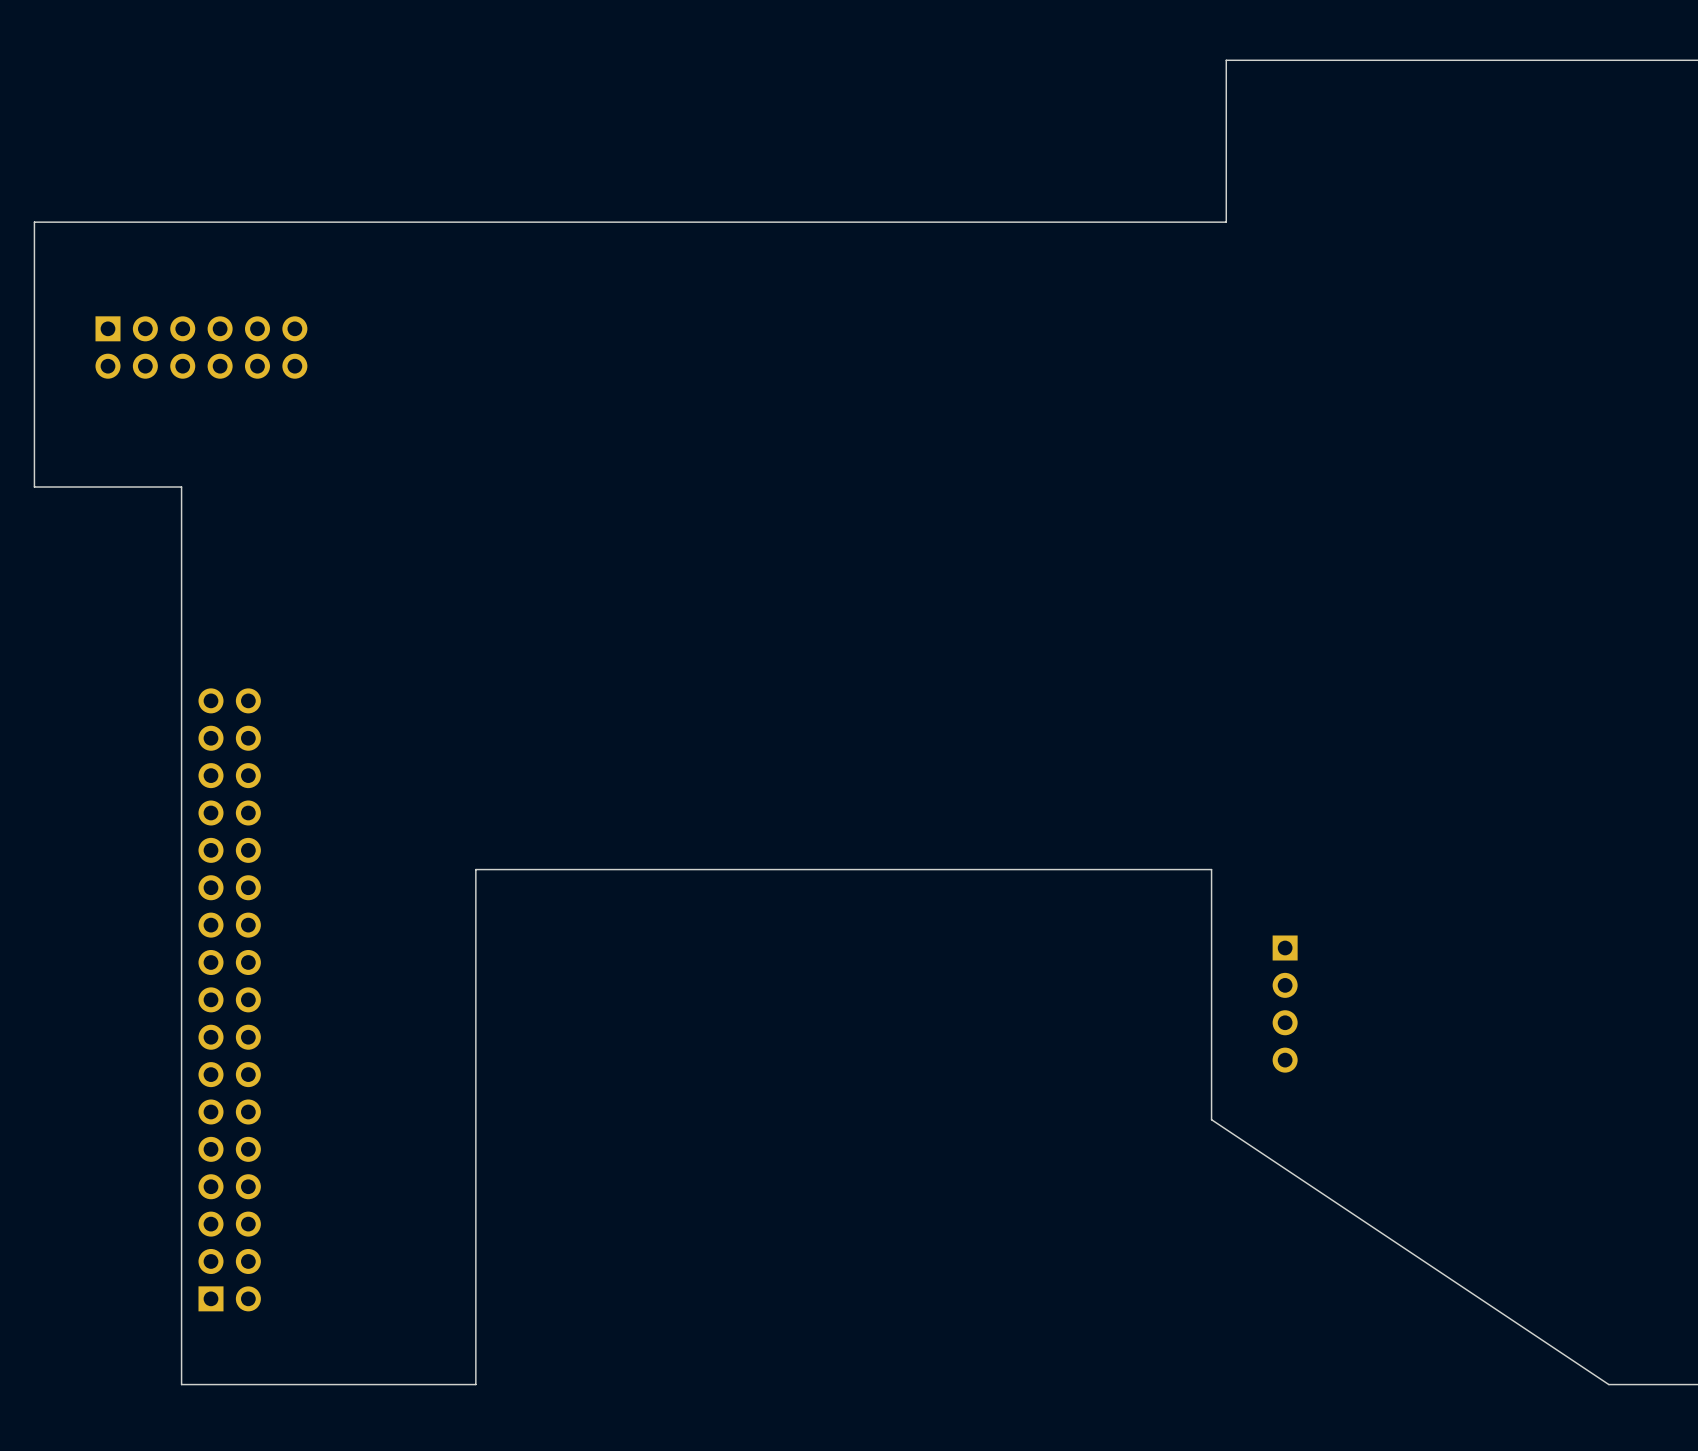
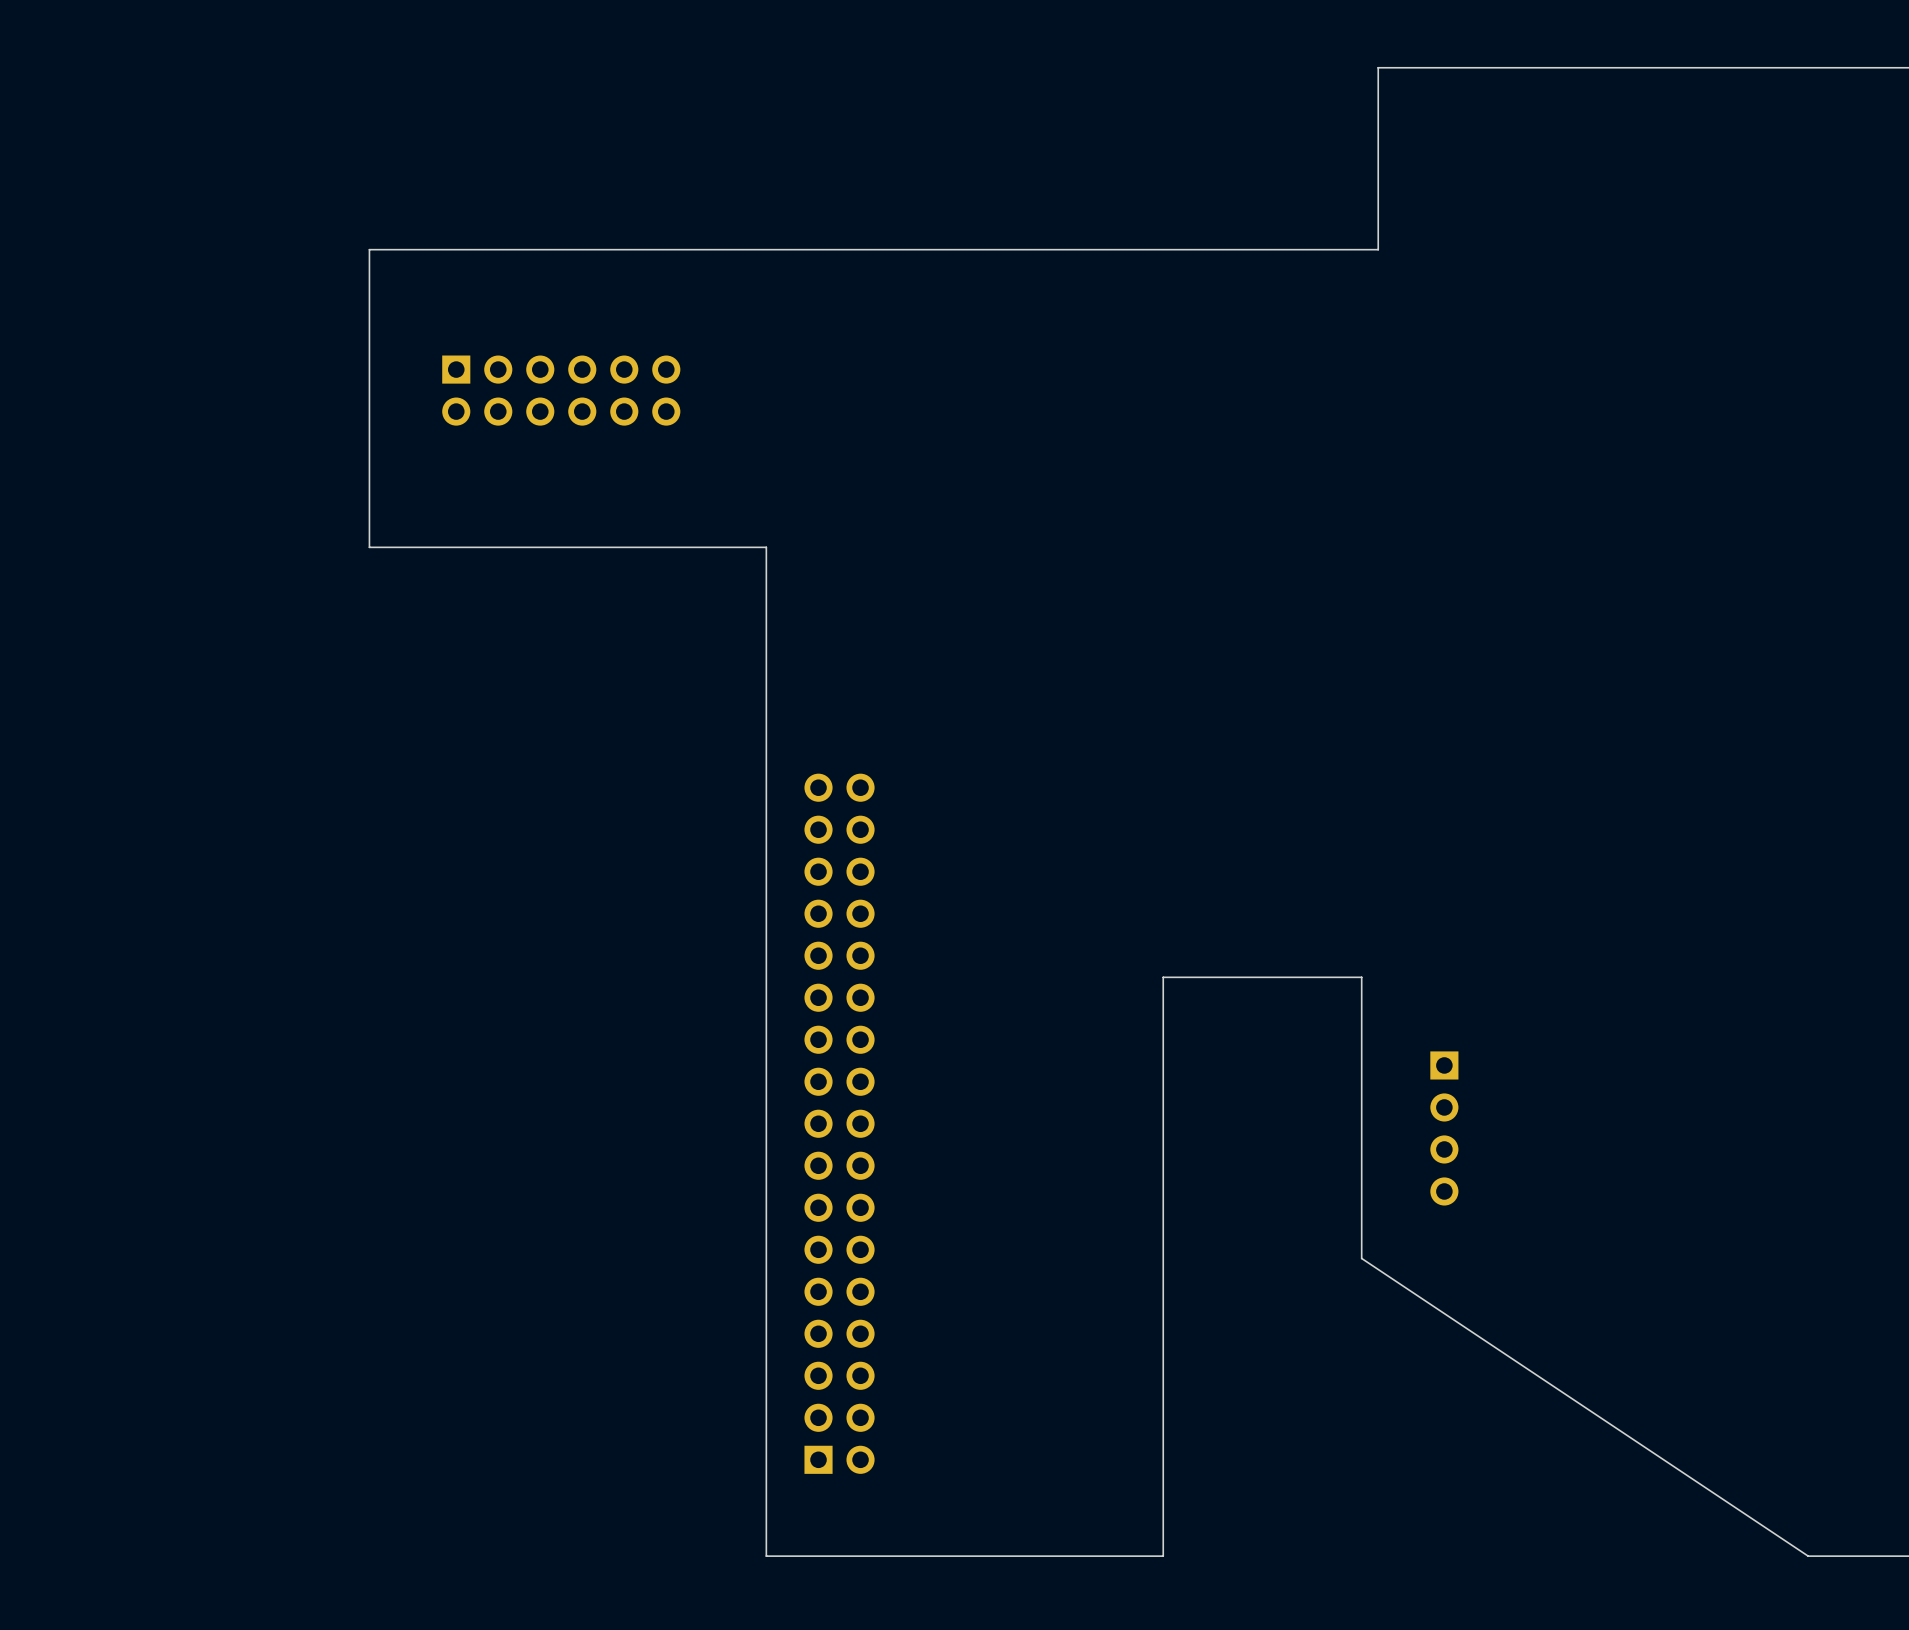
board edge: (328, 222) (34, 222) (34, 487) (181, 487) (181, 1384) (475, 1384) (475, 869) (1034, 869) -> (369, 249) (369, 547) (766, 547) (766, 1556) (1163, 1556) (1163, 977)
part position: (201, 347) -> (561, 390)
part: (229, 999) -> none
part: none -> (839, 1123)

